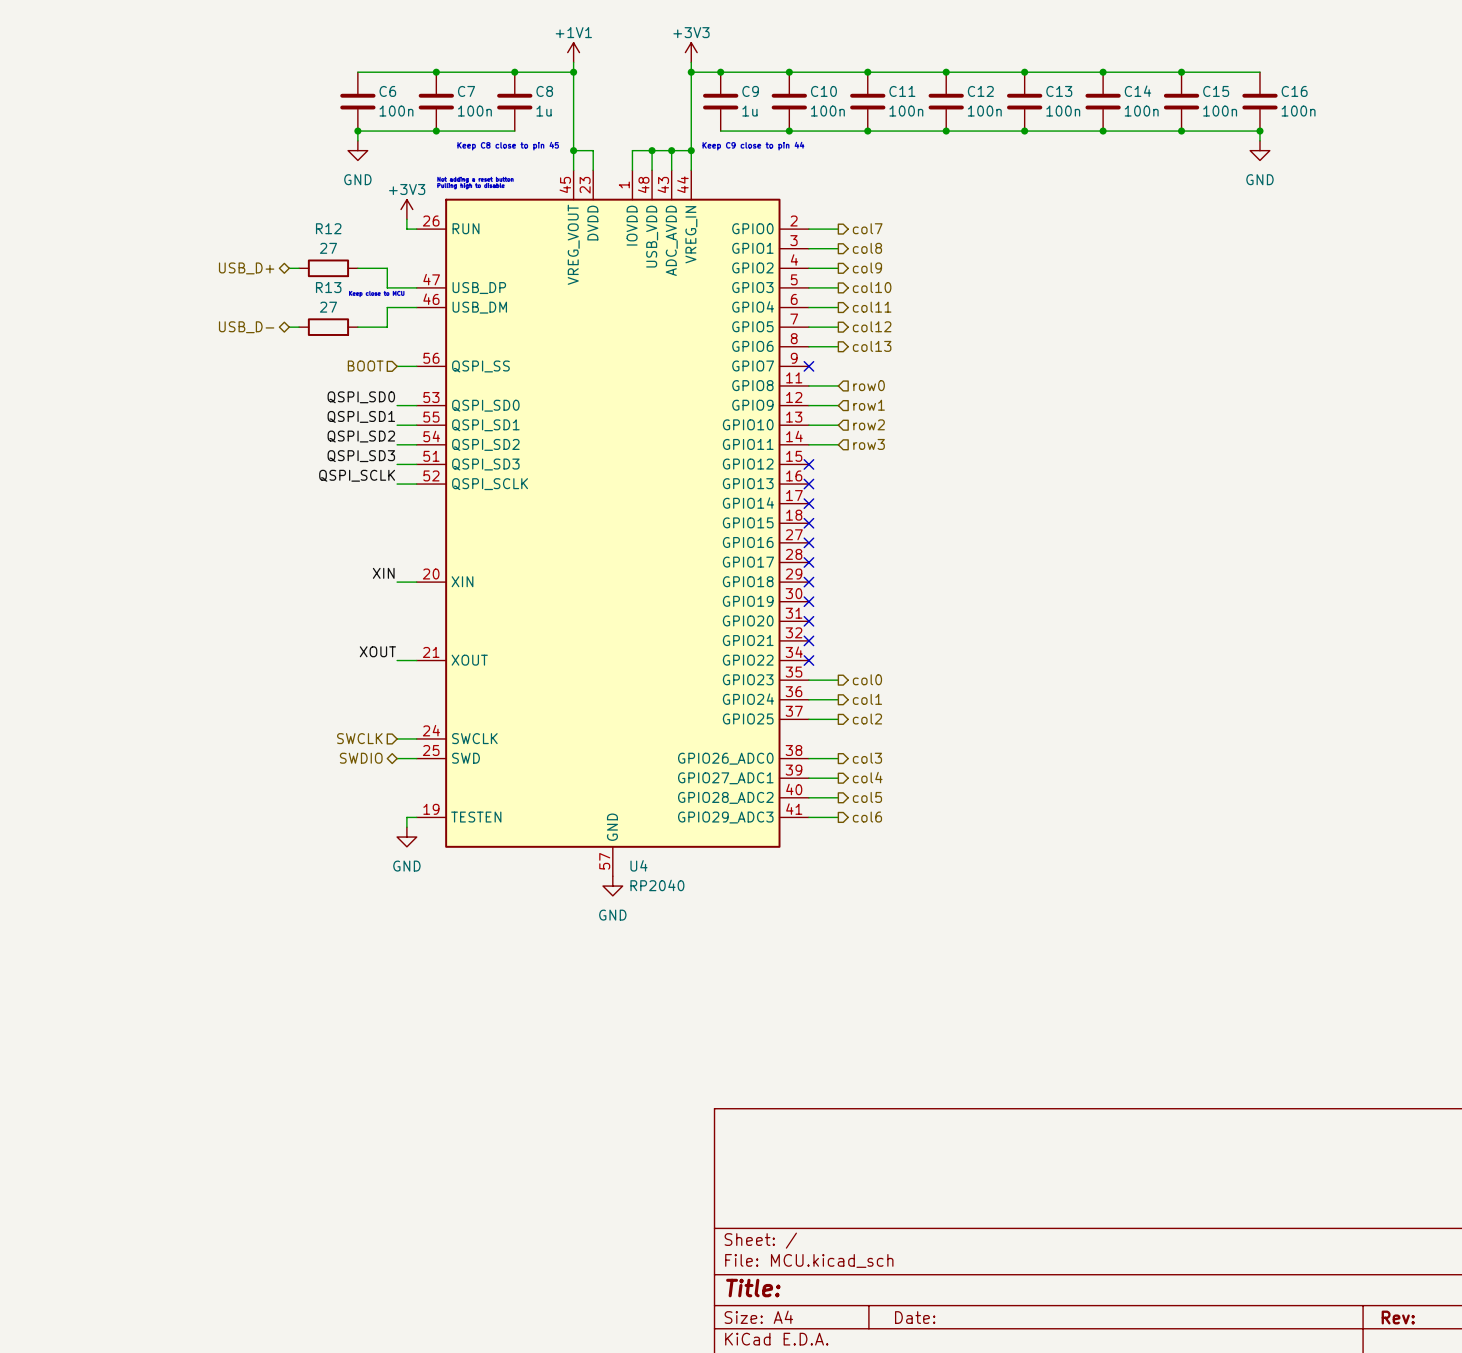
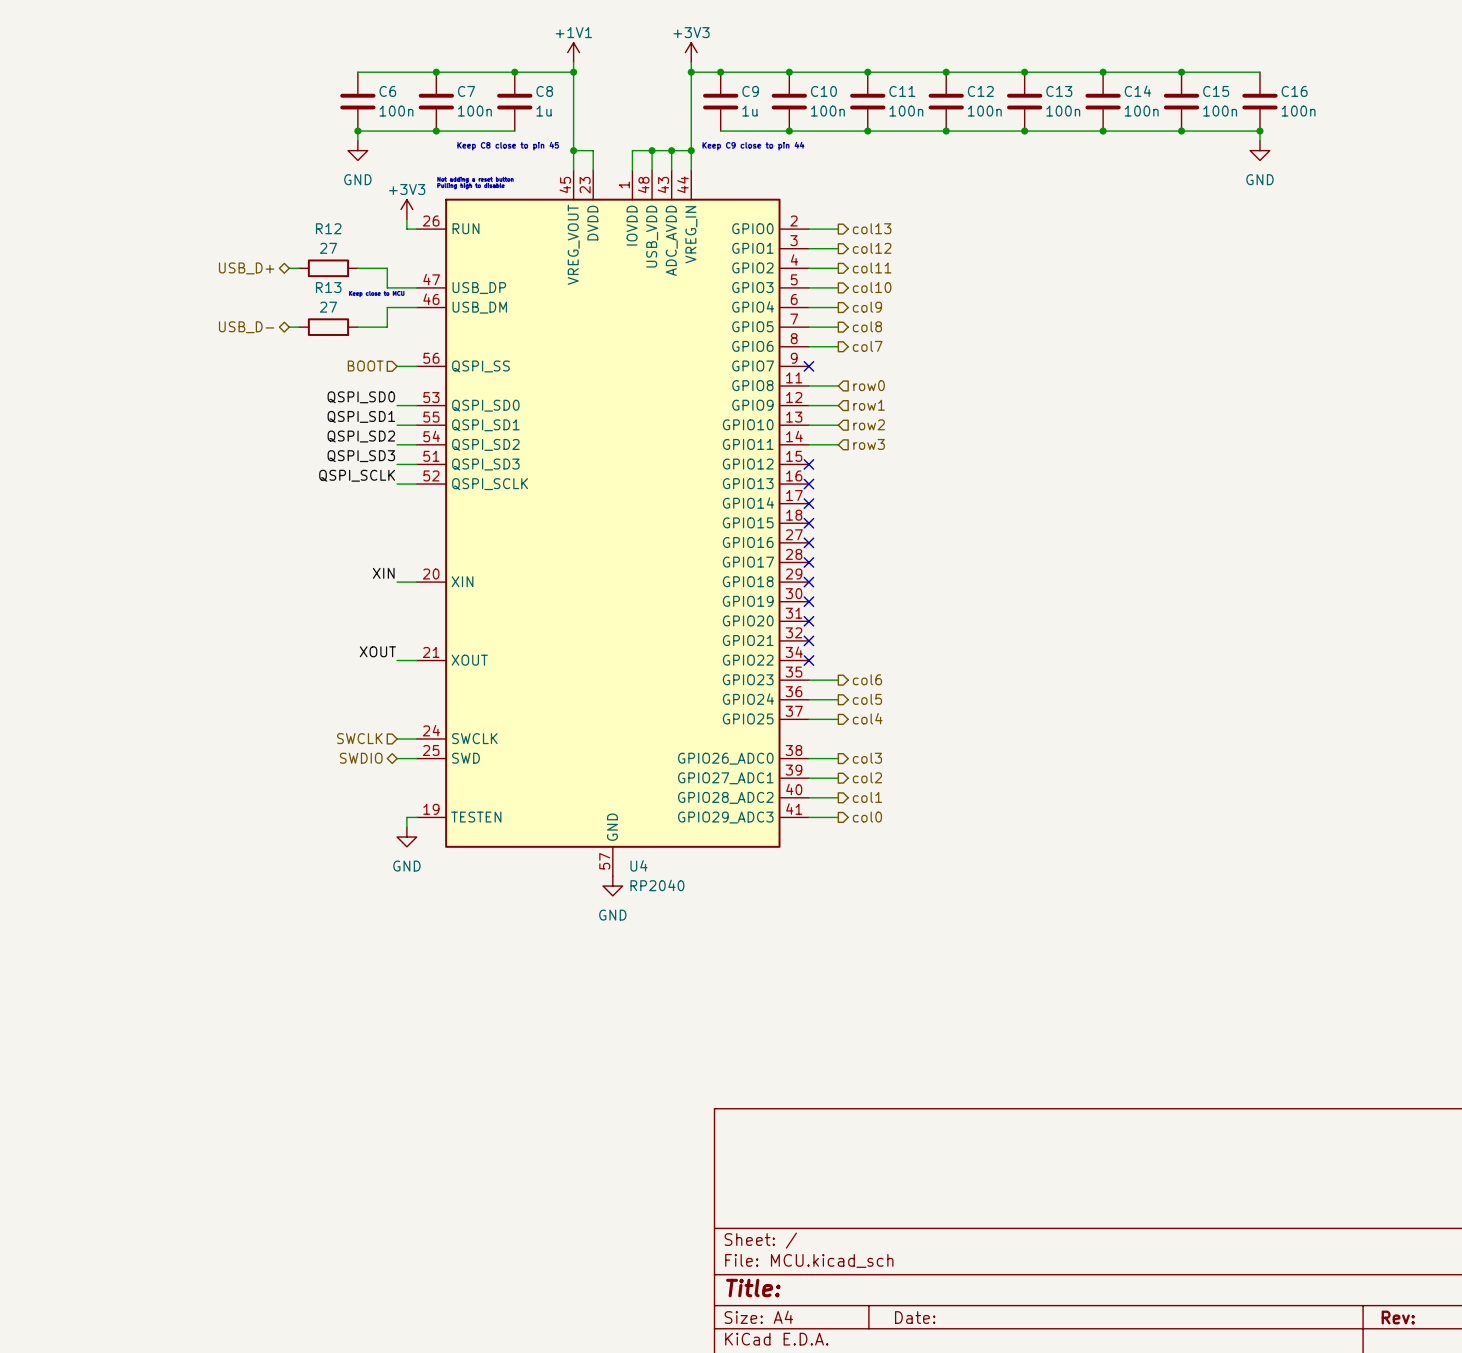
hierarchical label: col7 (867, 228) -> col13 (872, 228)
hierarchical label: col8 (867, 248) -> col12 (872, 248)
hierarchical label: col9 (867, 267) -> col11 (872, 267)
hierarchical label: col11 (872, 307) -> col9 (867, 307)
hierarchical label: col12 (872, 326) -> col8 (867, 326)
hierarchical label: col13 (872, 346) -> col7 (867, 346)
hierarchical label: col0 (867, 679) -> col6 (867, 679)
hierarchical label: col1 (867, 699) -> col5 (867, 699)
hierarchical label: col2 (867, 719) -> col4 (867, 718)
hierarchical label: col4 (867, 777) -> col2 (867, 777)
hierarchical label: col5 (867, 797) -> col1 (867, 797)
hierarchical label: col6 (867, 817) -> col0 (867, 817)

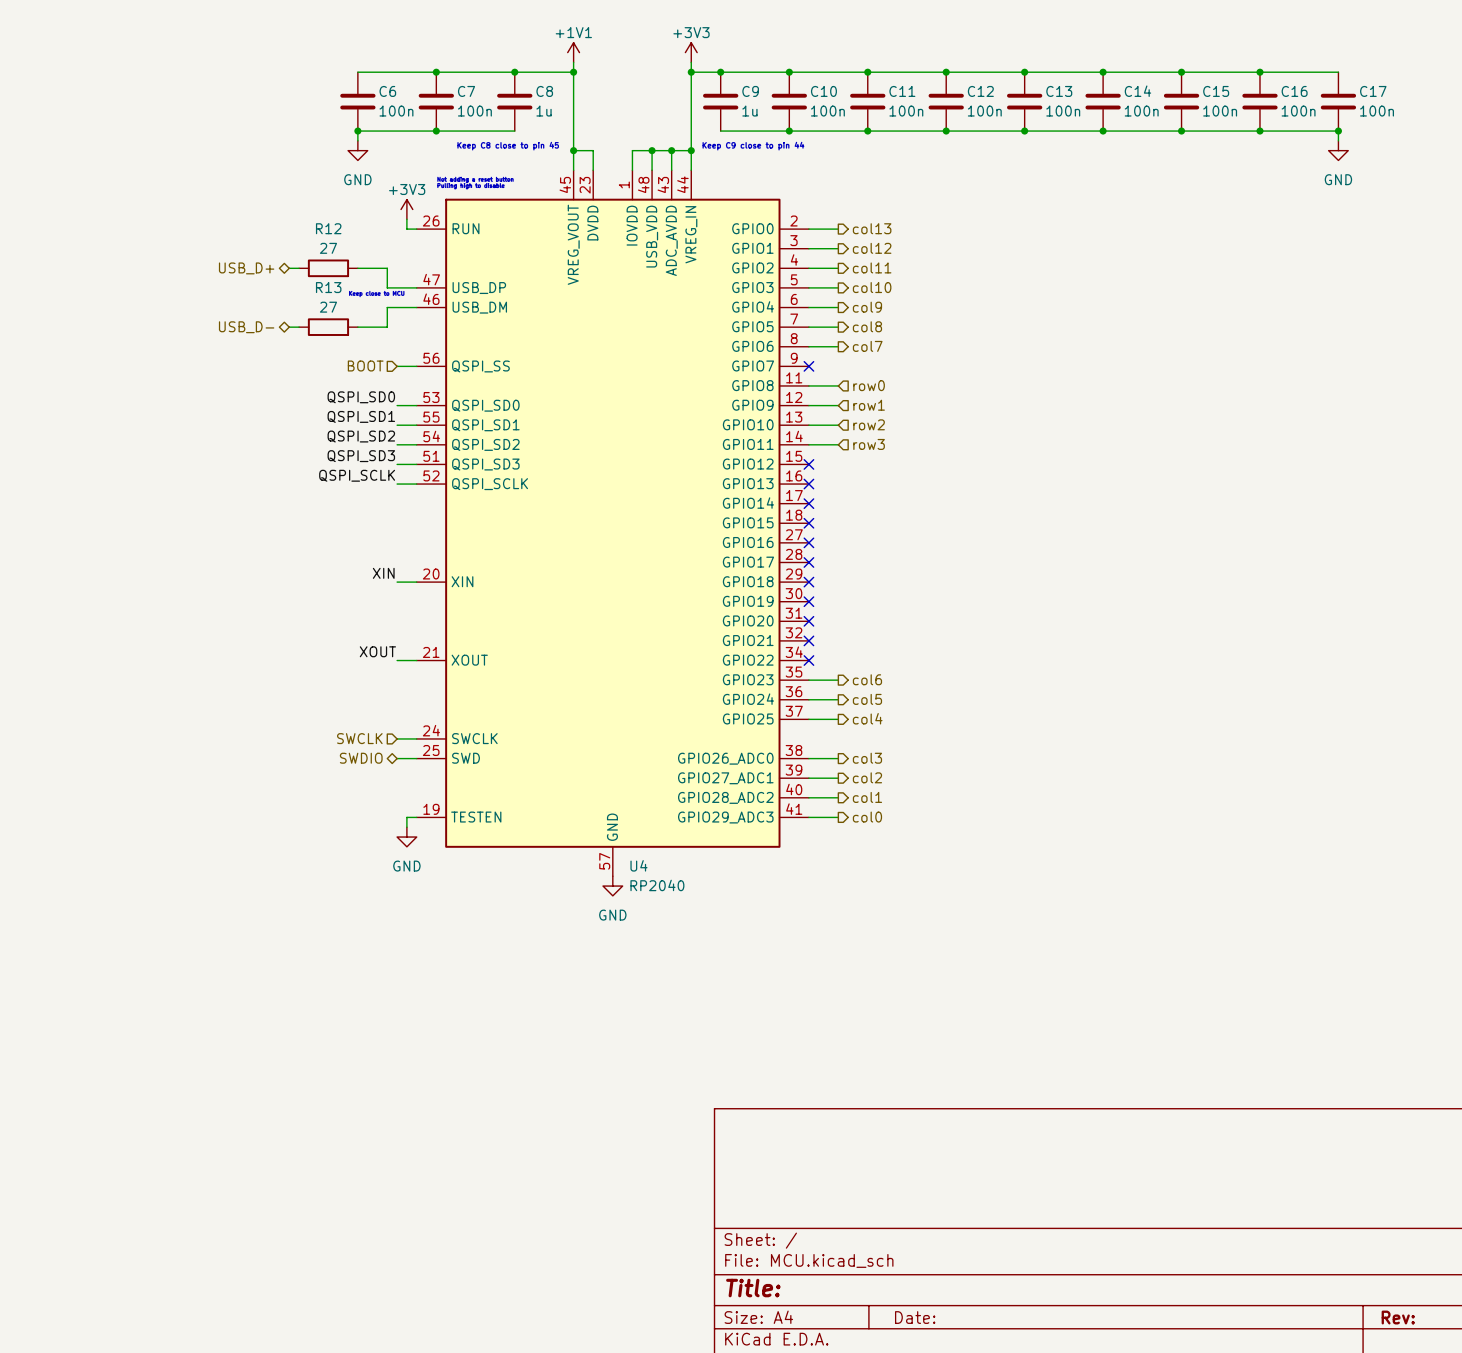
wire: none -> (1259, 72) (1338, 72)
junction: none -> (1259, 72)
C17: none -> 100n (1338, 101)
wire: (1259, 131) (1259, 140) -> (1259, 131) (1338, 131) (1338, 140)
junction: none -> (1338, 131)
power symbol position: GND (1259, 150) -> GND (1338, 150)

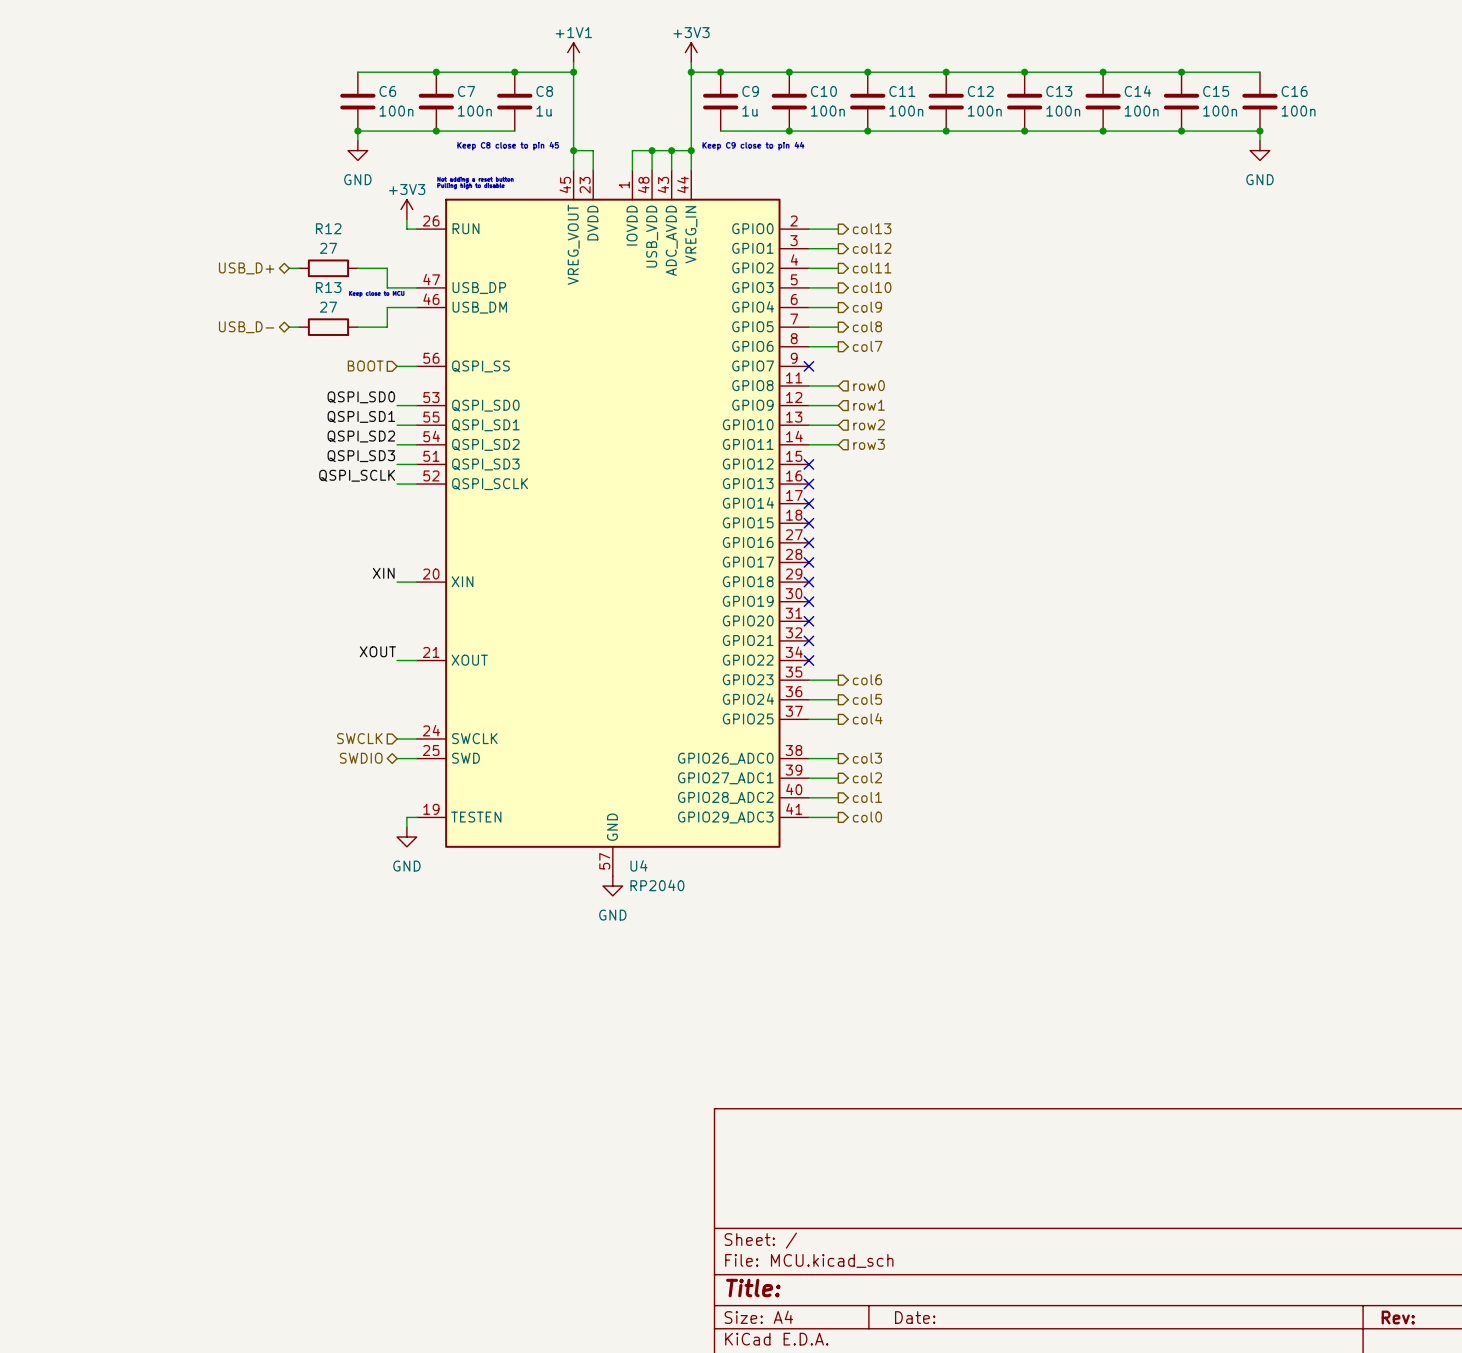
wire: (1259, 72) (1338, 72) -> none
junction: (1259, 72) -> none
C17: 100n (1338, 101) -> none
wire: (1259, 131) (1338, 131) (1338, 140) -> (1259, 131) (1259, 140)
junction: (1338, 131) -> none
power symbol position: GND (1338, 150) -> GND (1259, 150)

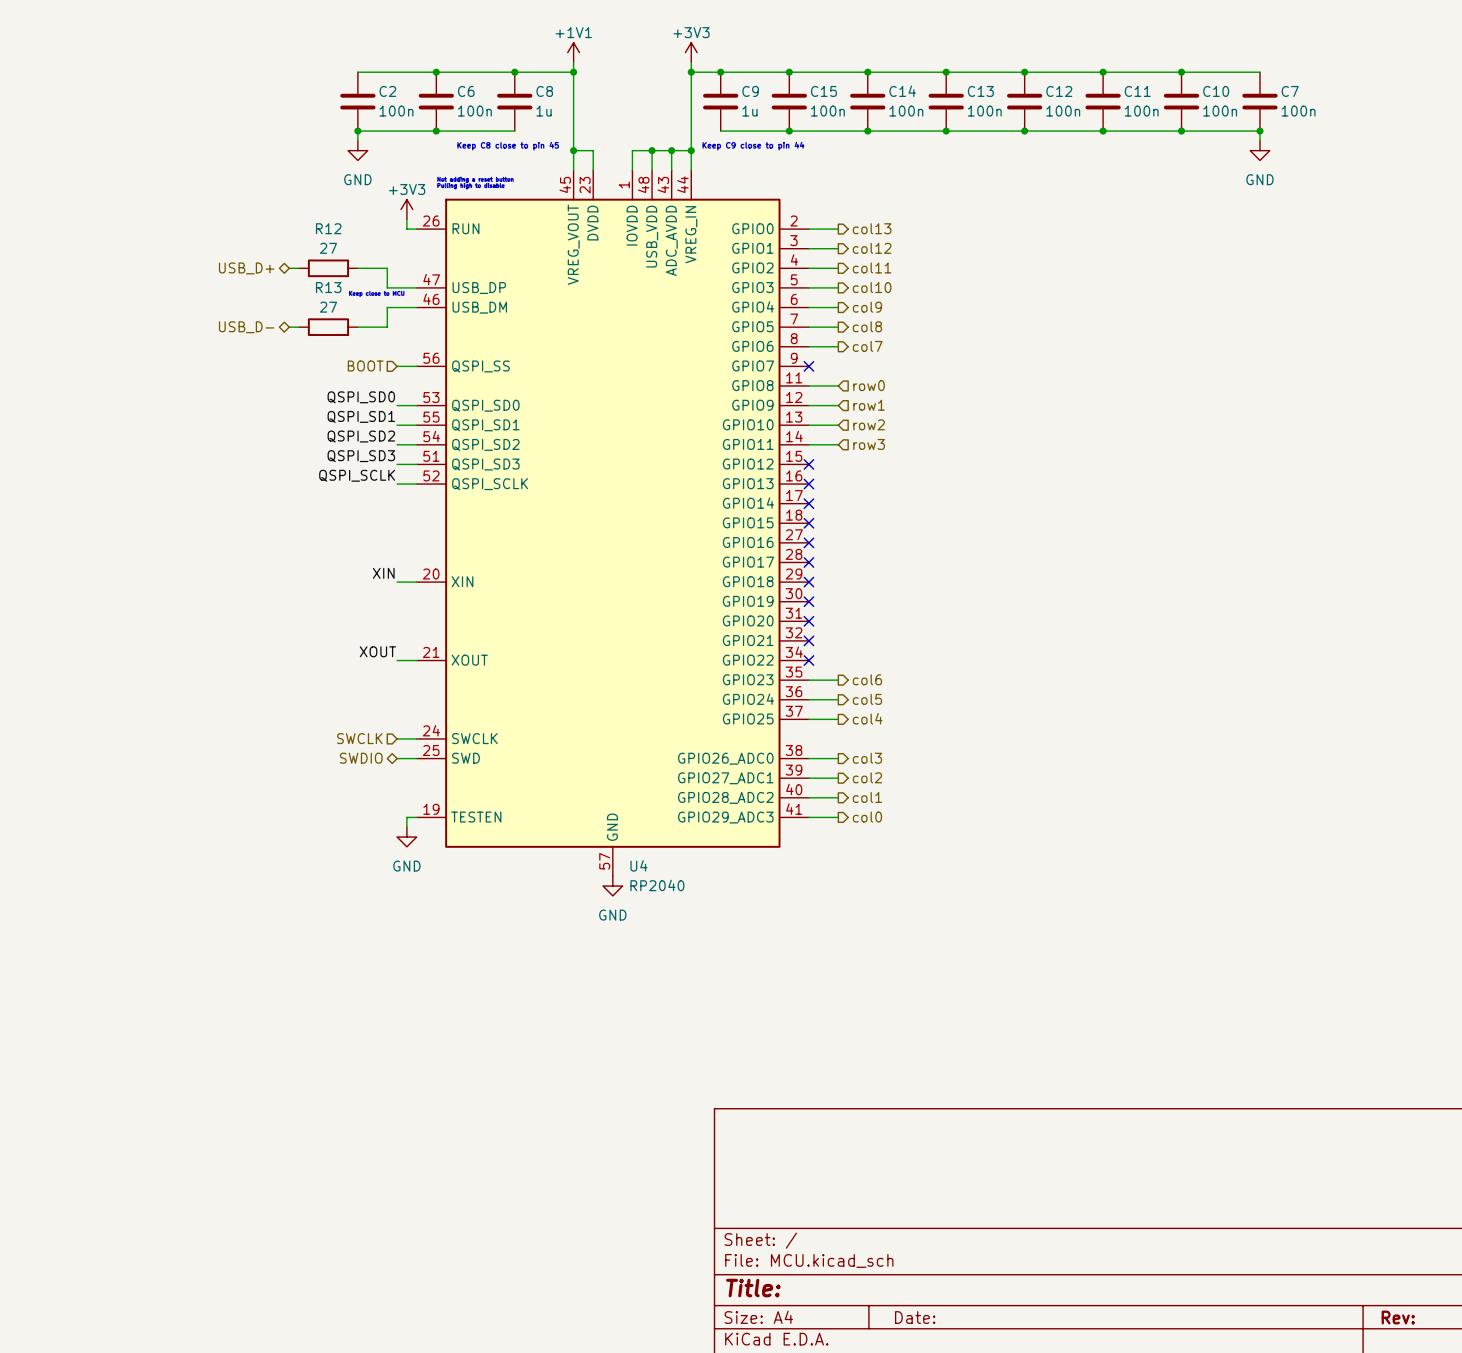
C6 name: C6 (387, 91) -> C2 (387, 91)
C7 name: C7 (466, 91) -> C6 (466, 91)
C10 name: C10 (823, 91) -> C15 (823, 91)
C11 name: C11 (902, 91) -> C14 (902, 91)
C12 name: C12 (980, 91) -> C13 (980, 91)
C13 name: C13 (1059, 91) -> C12 (1059, 91)
C14 name: C14 (1137, 91) -> C11 (1137, 91)
C15 name: C15 (1216, 91) -> C10 (1216, 91)
C16 name: C16 (1294, 91) -> C7 (1290, 91)

